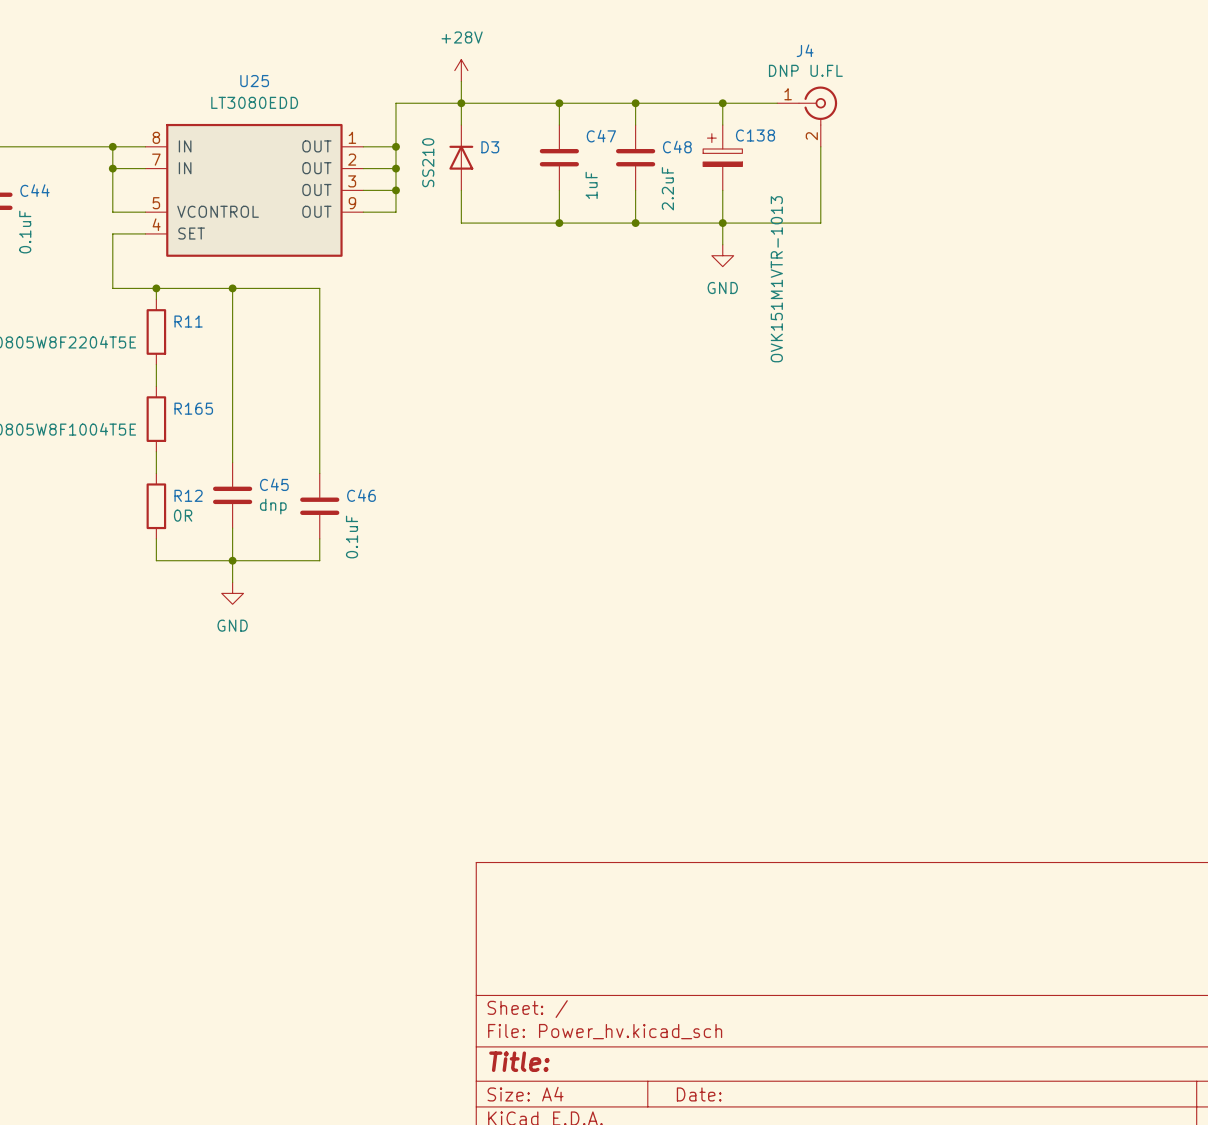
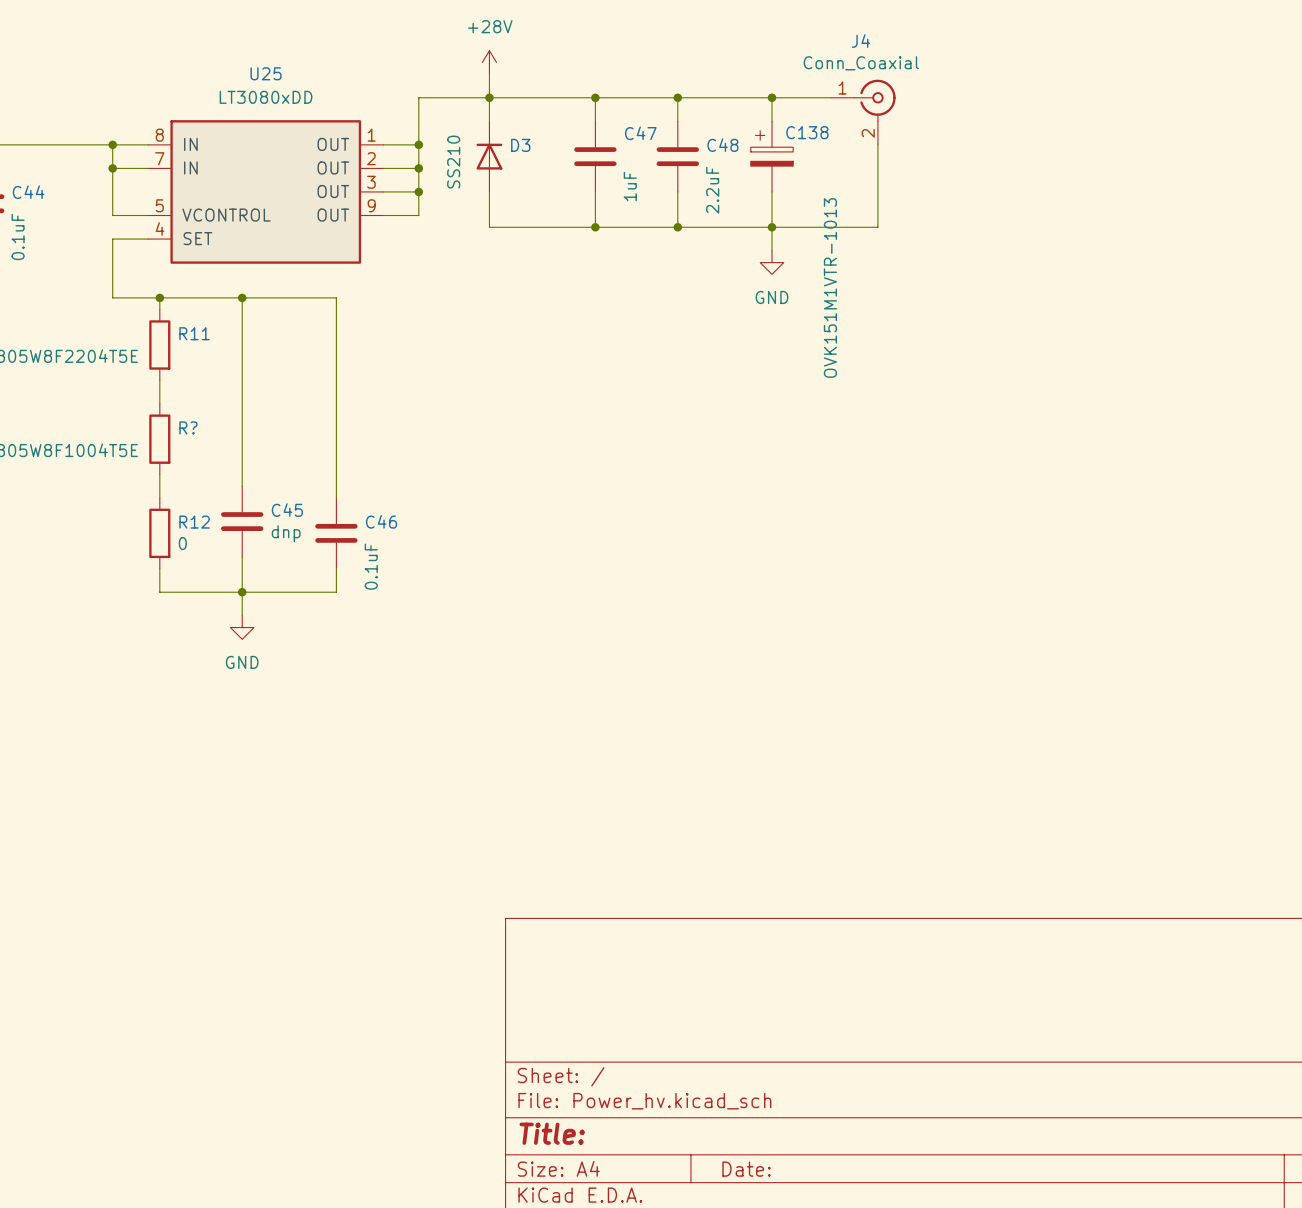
J4 value: DNP U.FL (805, 70) -> Conn_Coaxial (861, 63)
U25 value: LT3080EDD (254, 102) -> LT3080xDD (266, 97)
R165 name: R165 (193, 408) -> R? (188, 427)
R12 value: 0R (183, 515) -> 0 (182, 543)

